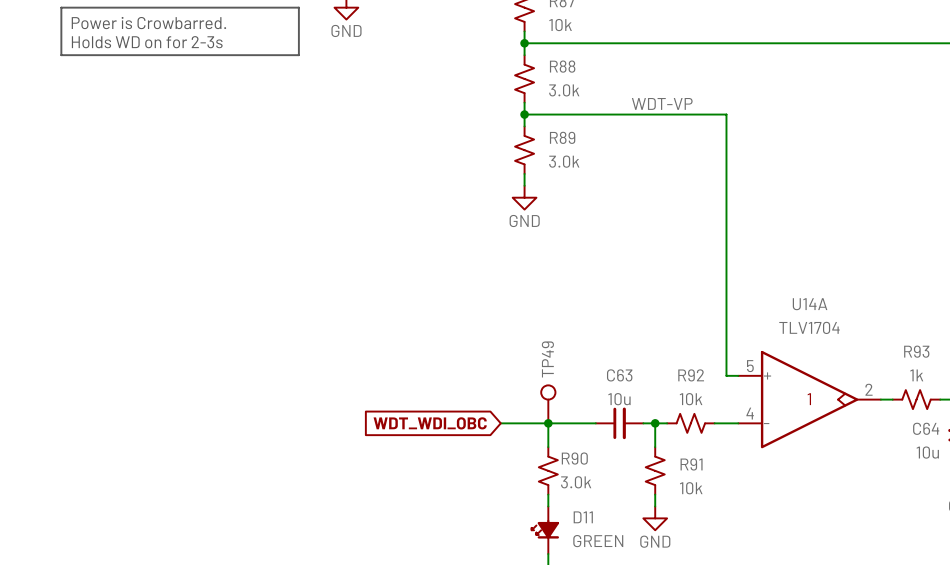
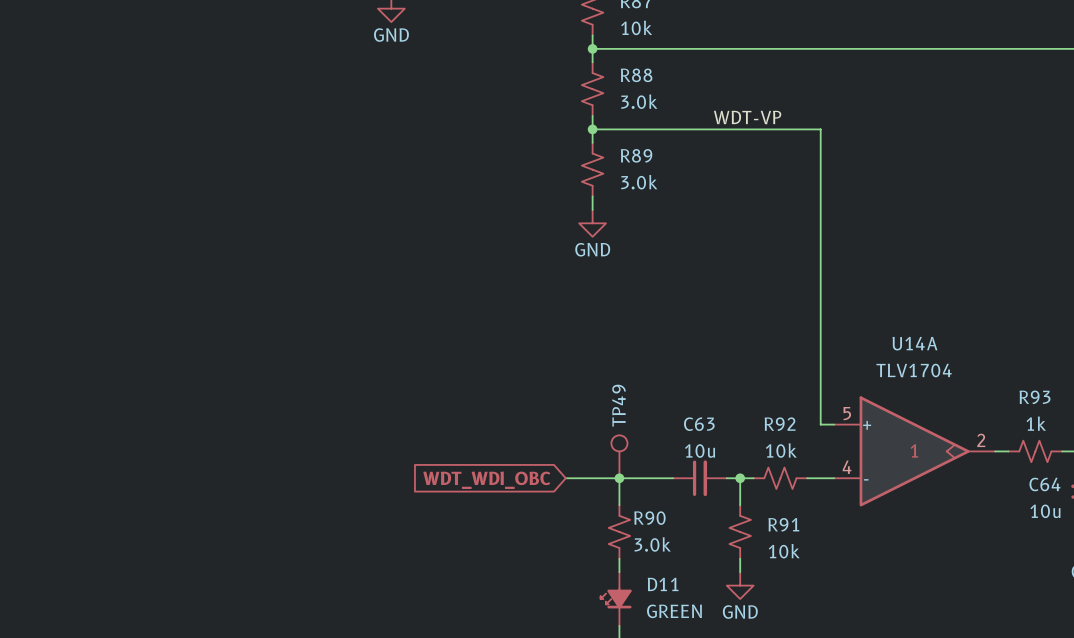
line: (61, 7) (298, 7) (298, 55) (61, 55) (61, 7) -> none
text: Power is Crowbarred. (148, 23) -> none
text: Holds WD on for 2-3s (147, 42) -> none

